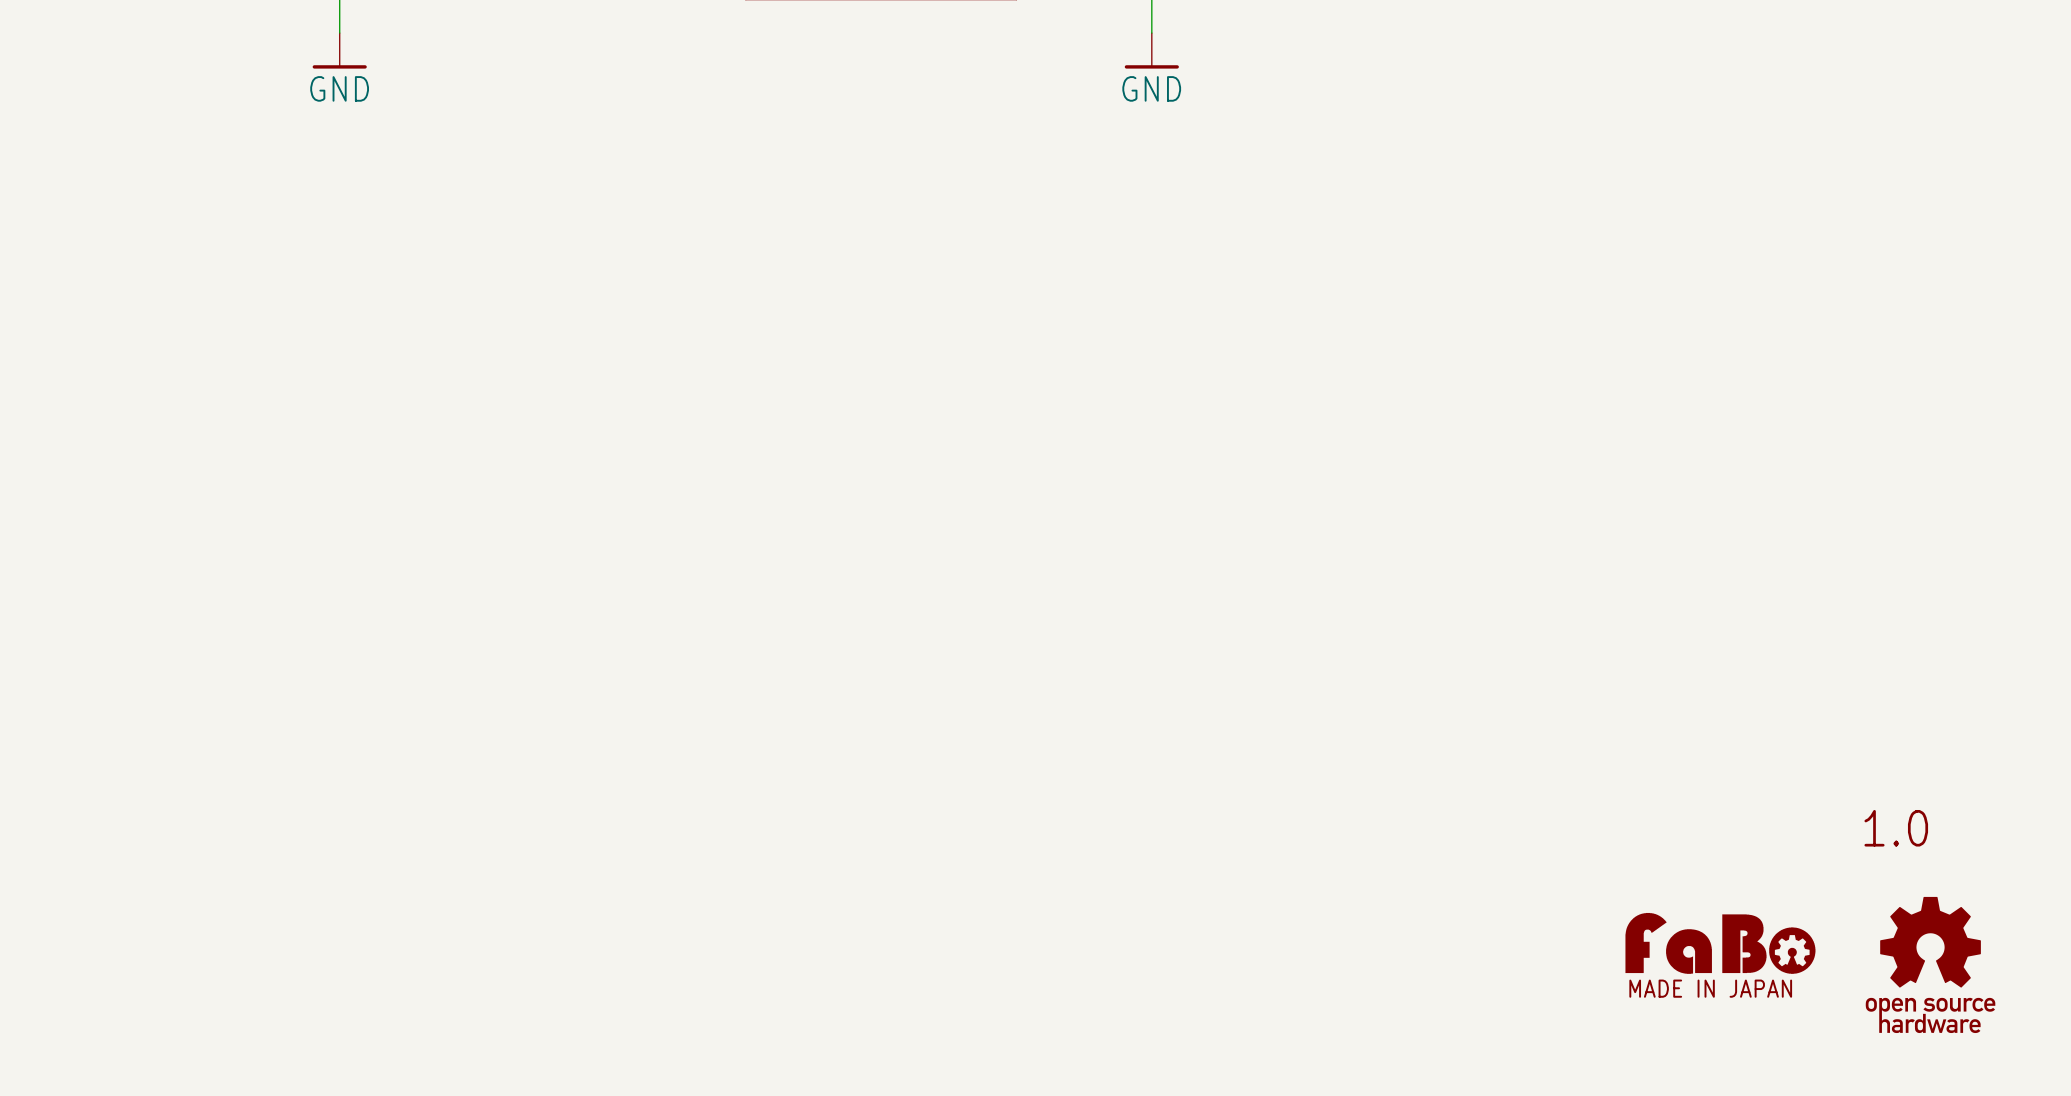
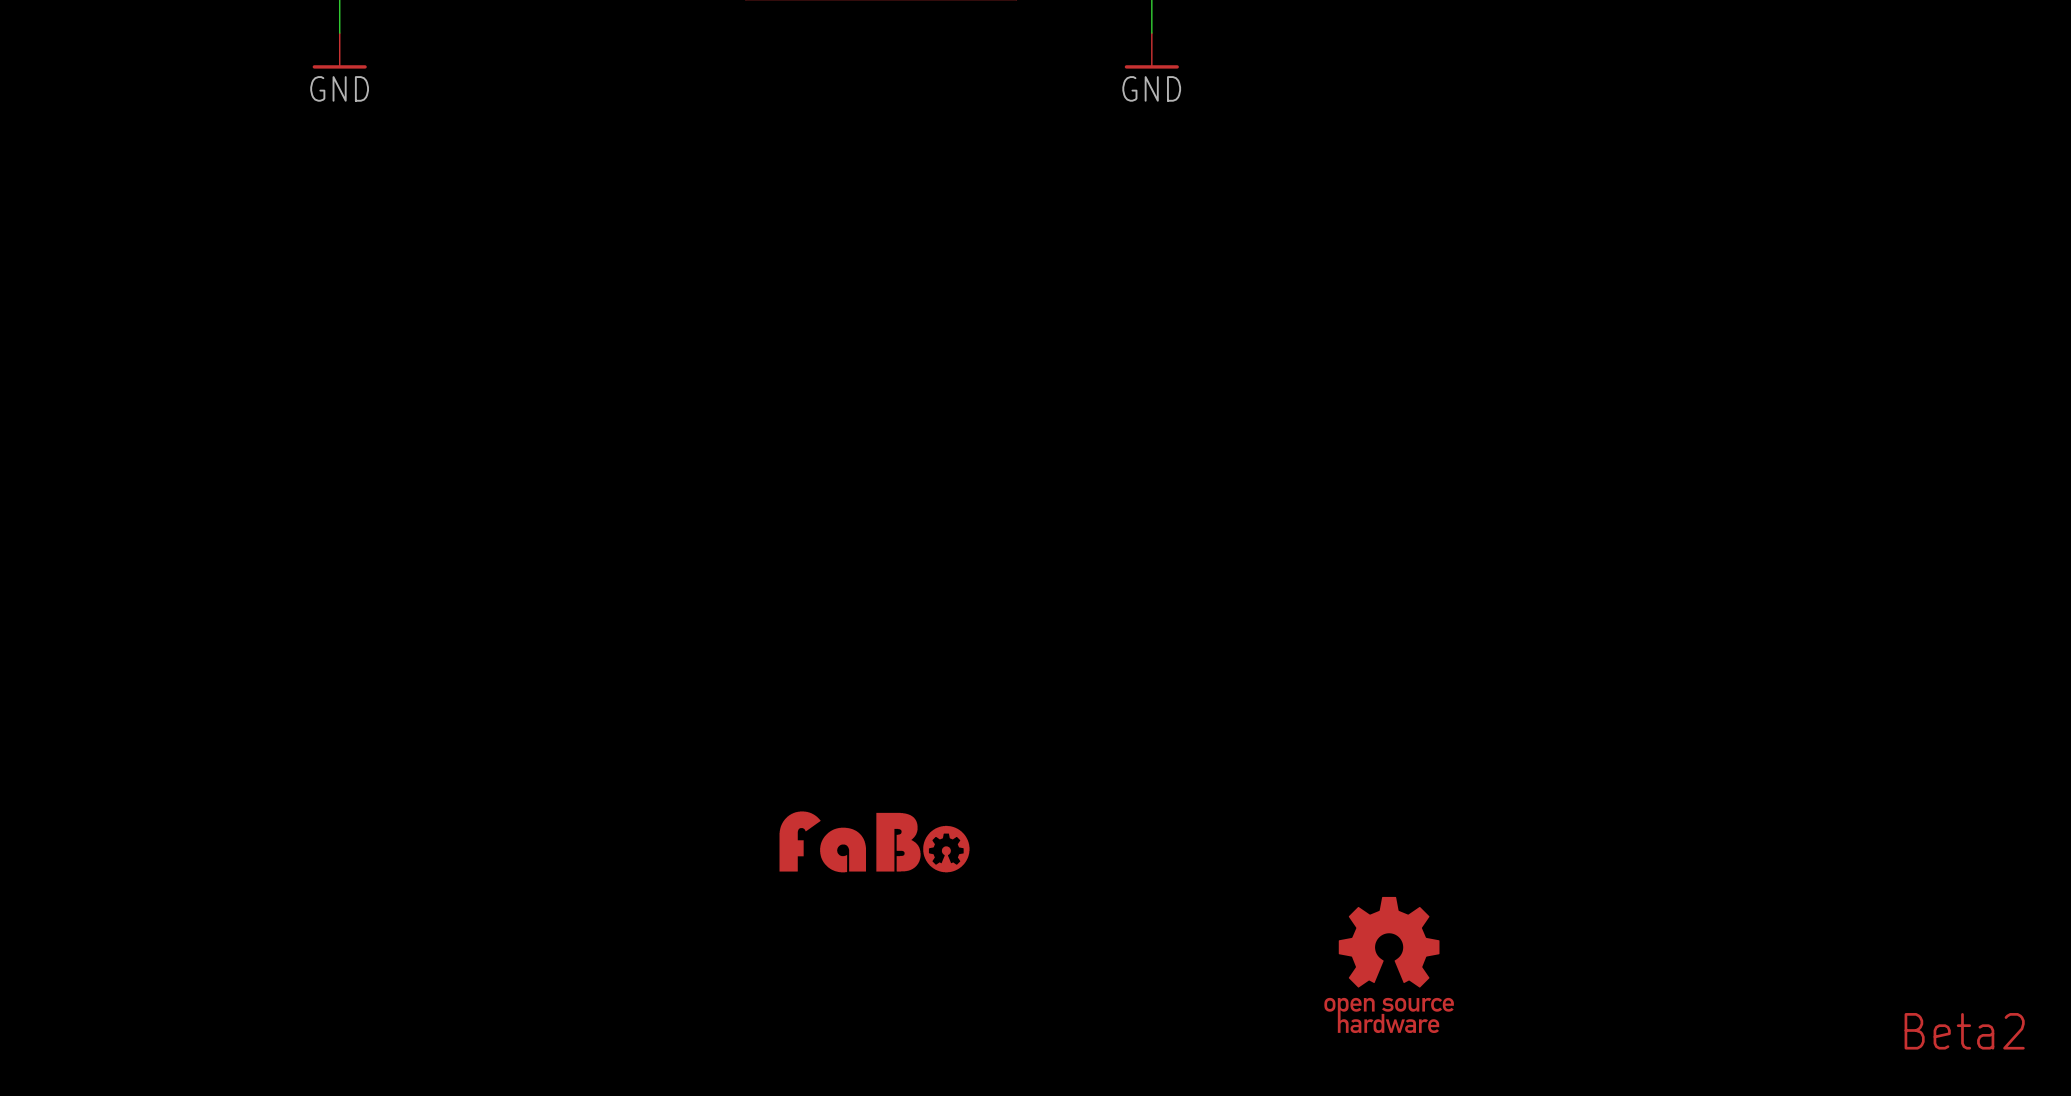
text: 1.0 (1896, 828) -> none
part: none -> (874, 841)
part: (1720, 943) -> none
part: none -> (1389, 964)
part: (1930, 964) -> none
text: none -> Beta2 (1964, 1031)

